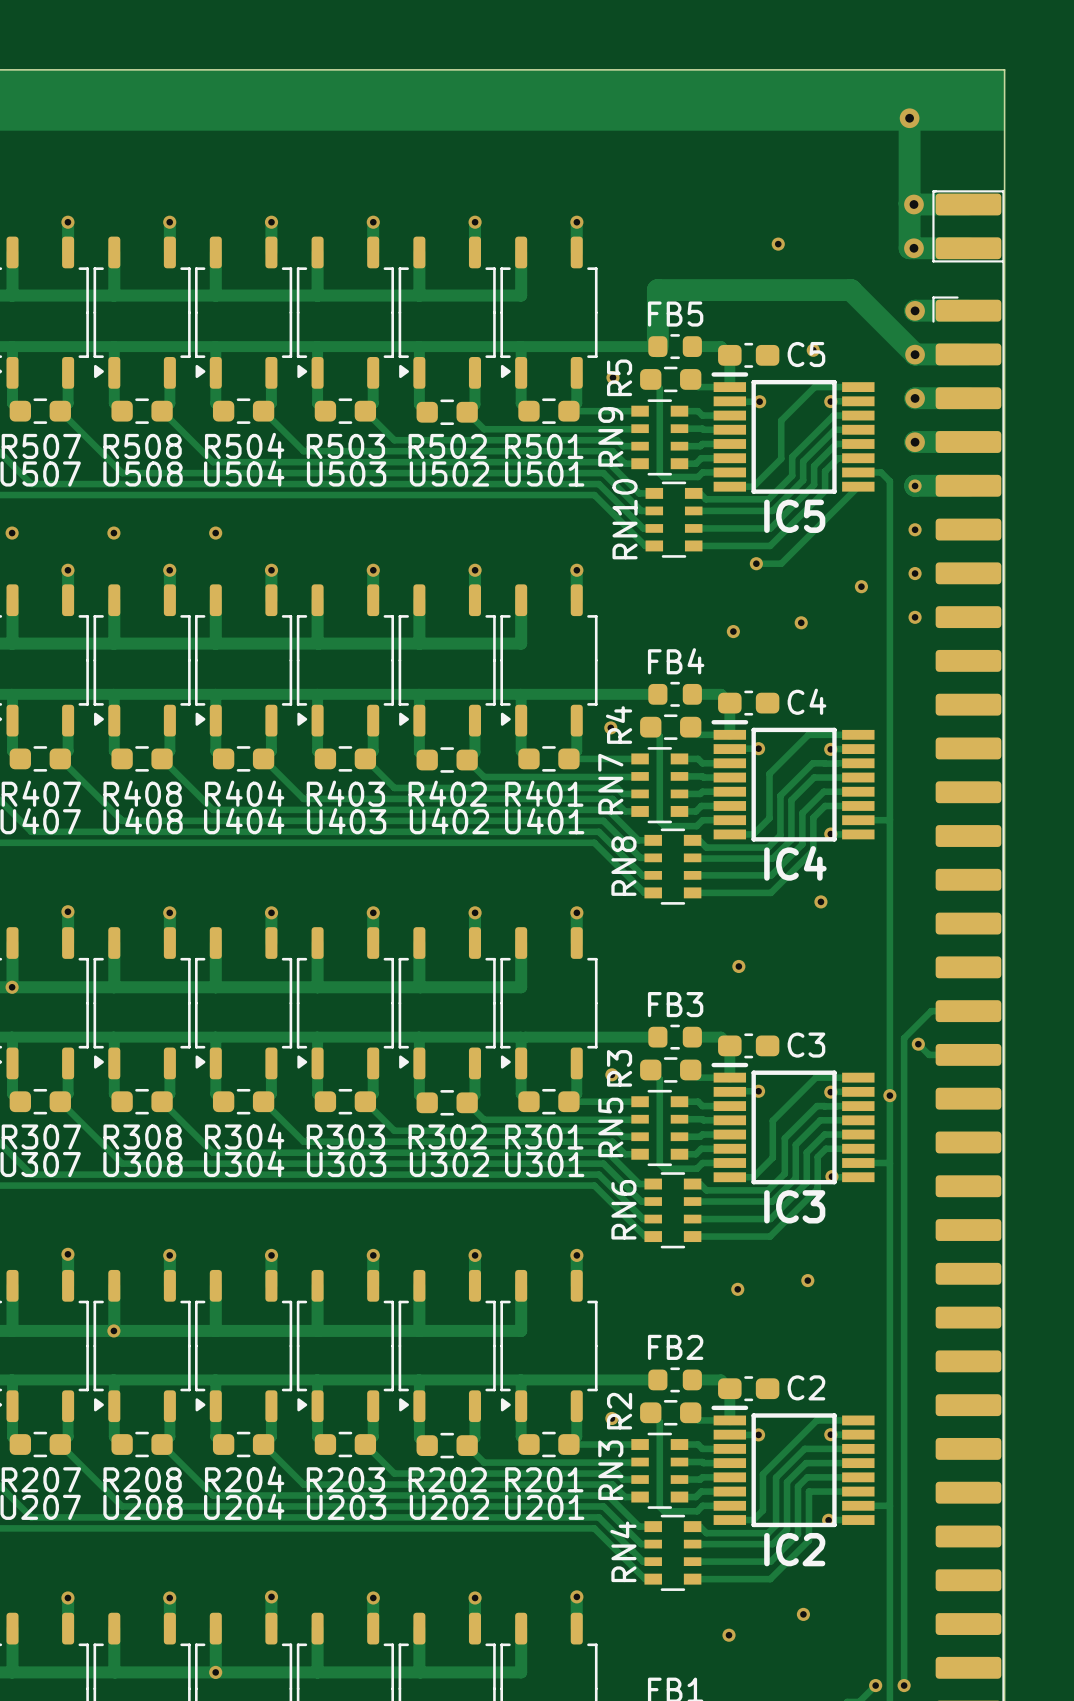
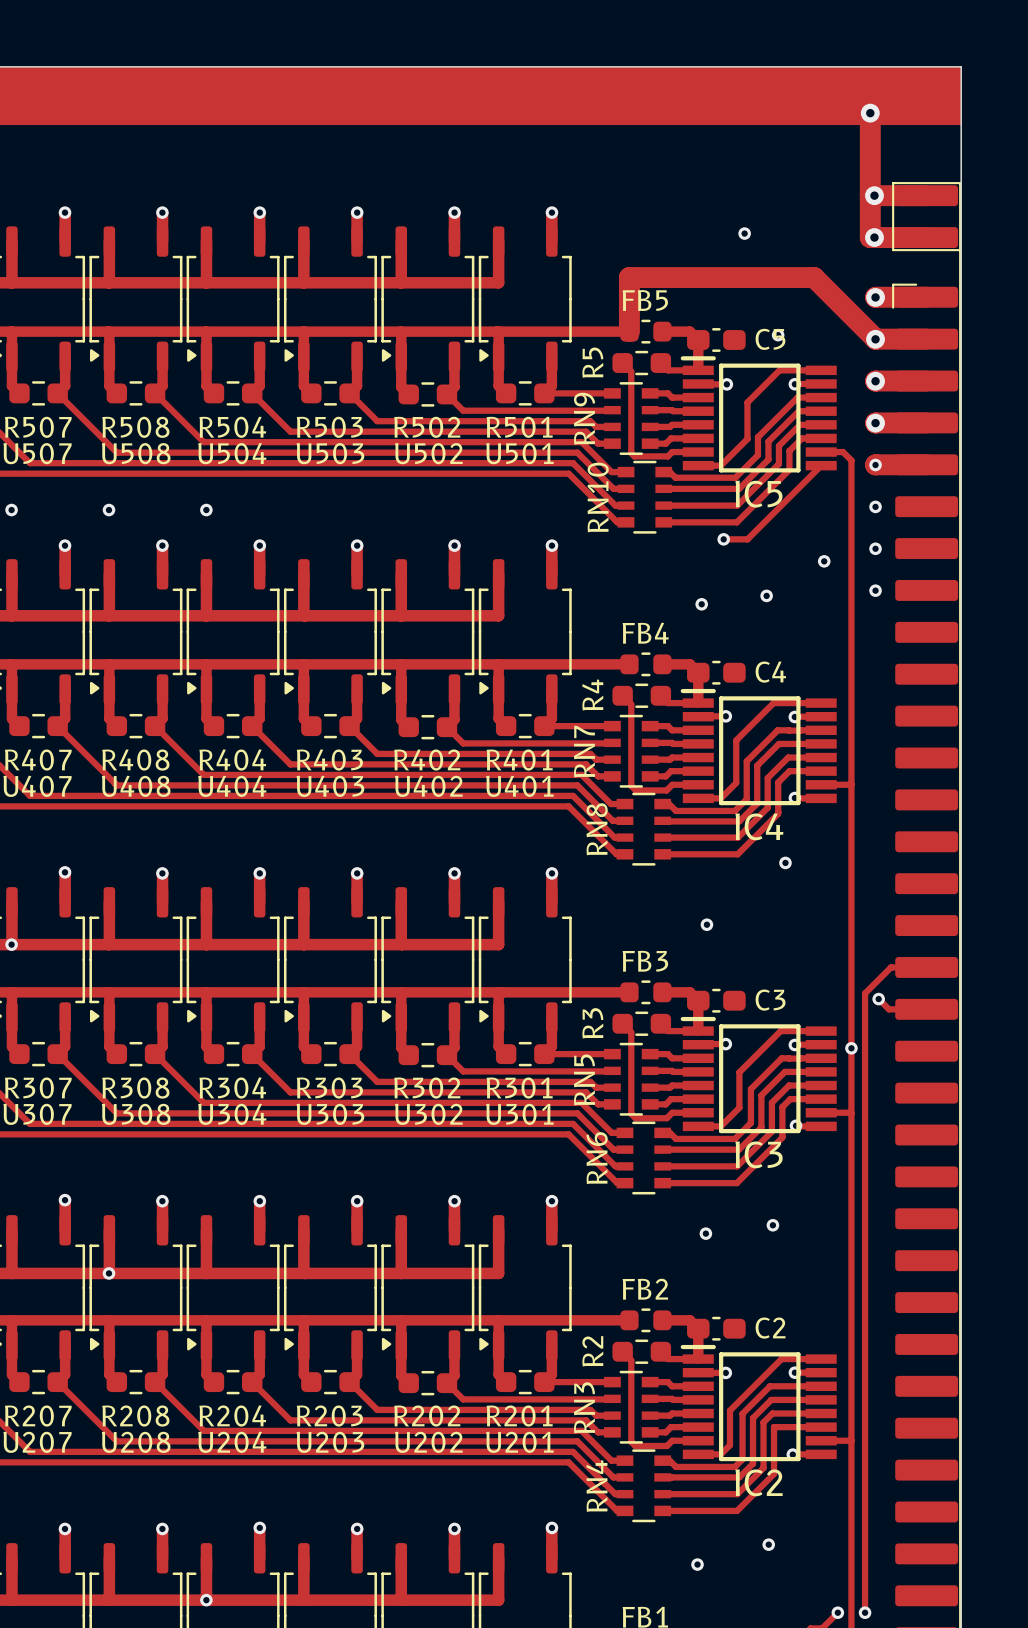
via: (612, 377) -> none
via: (610, 727) -> none
via: (611, 1074) -> none
via: (611, 1418) -> none

